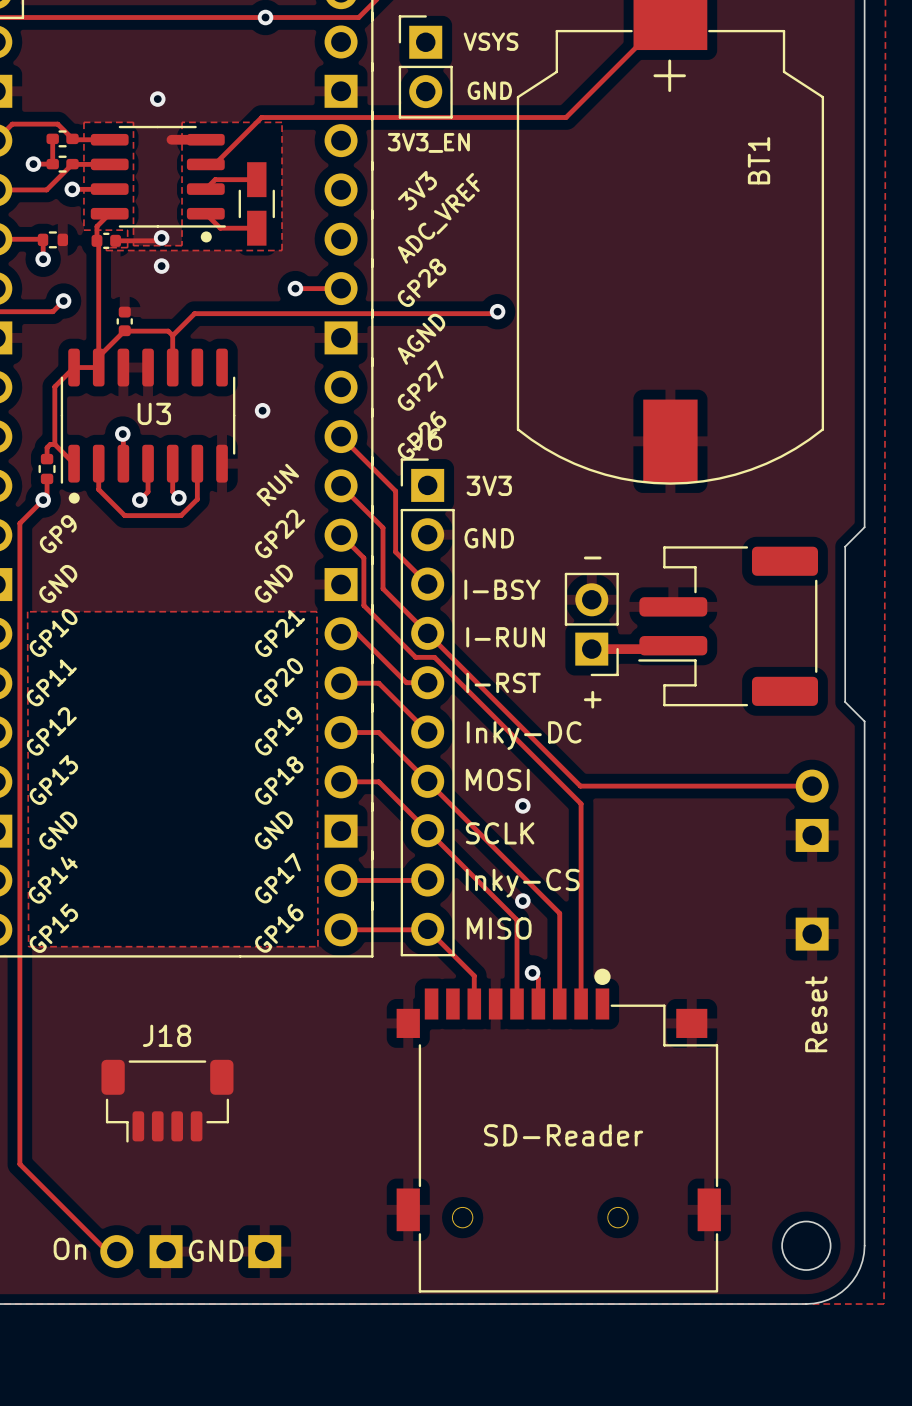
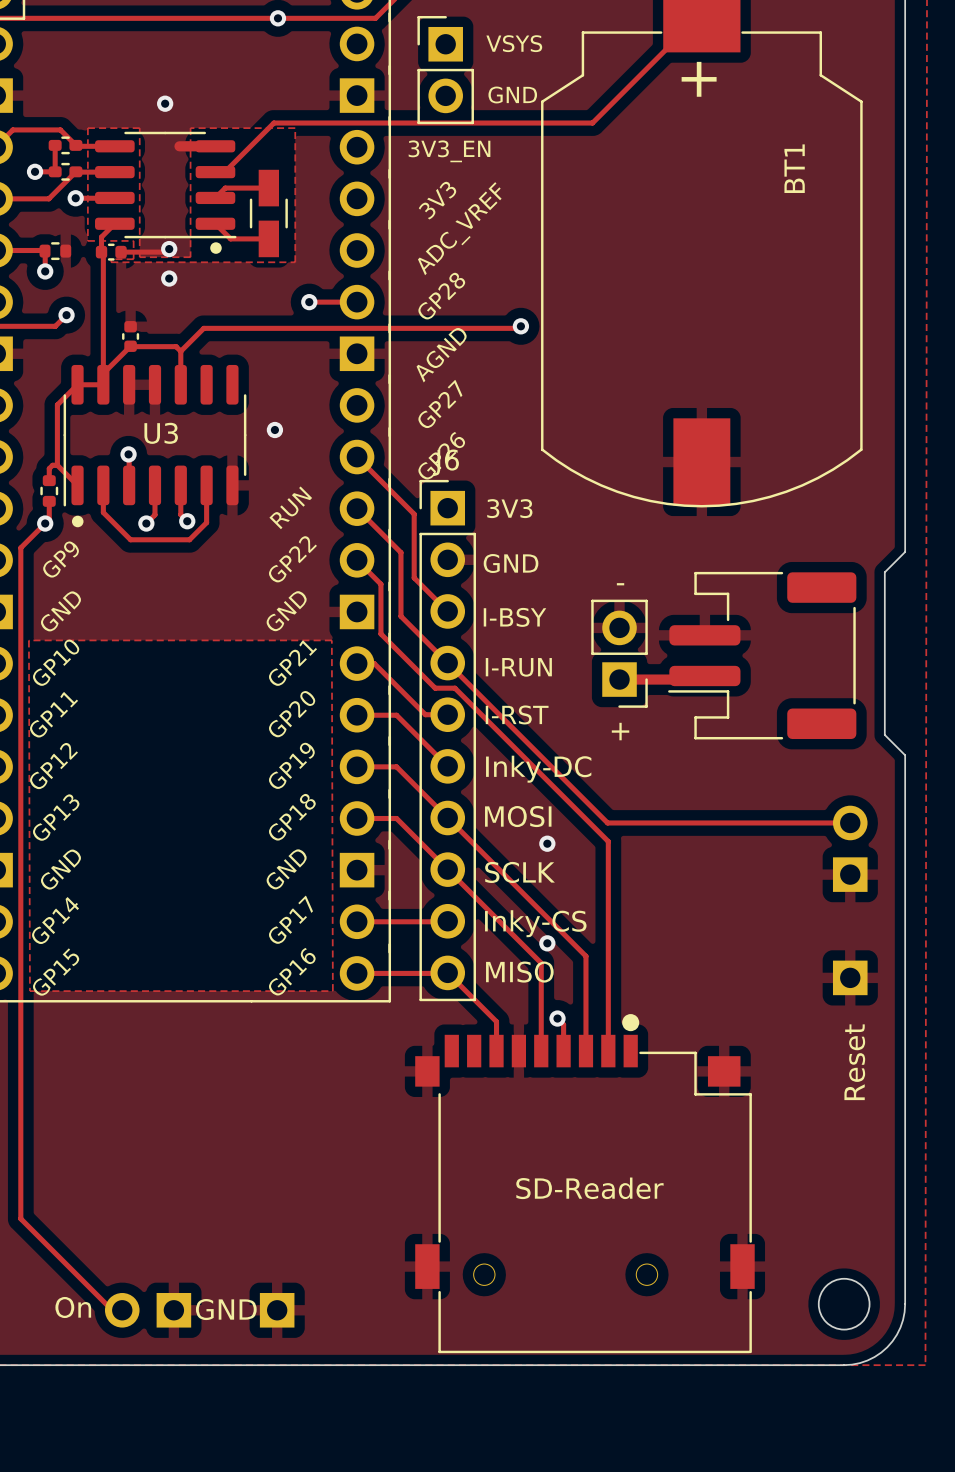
J18: (167, 1101) -> none

